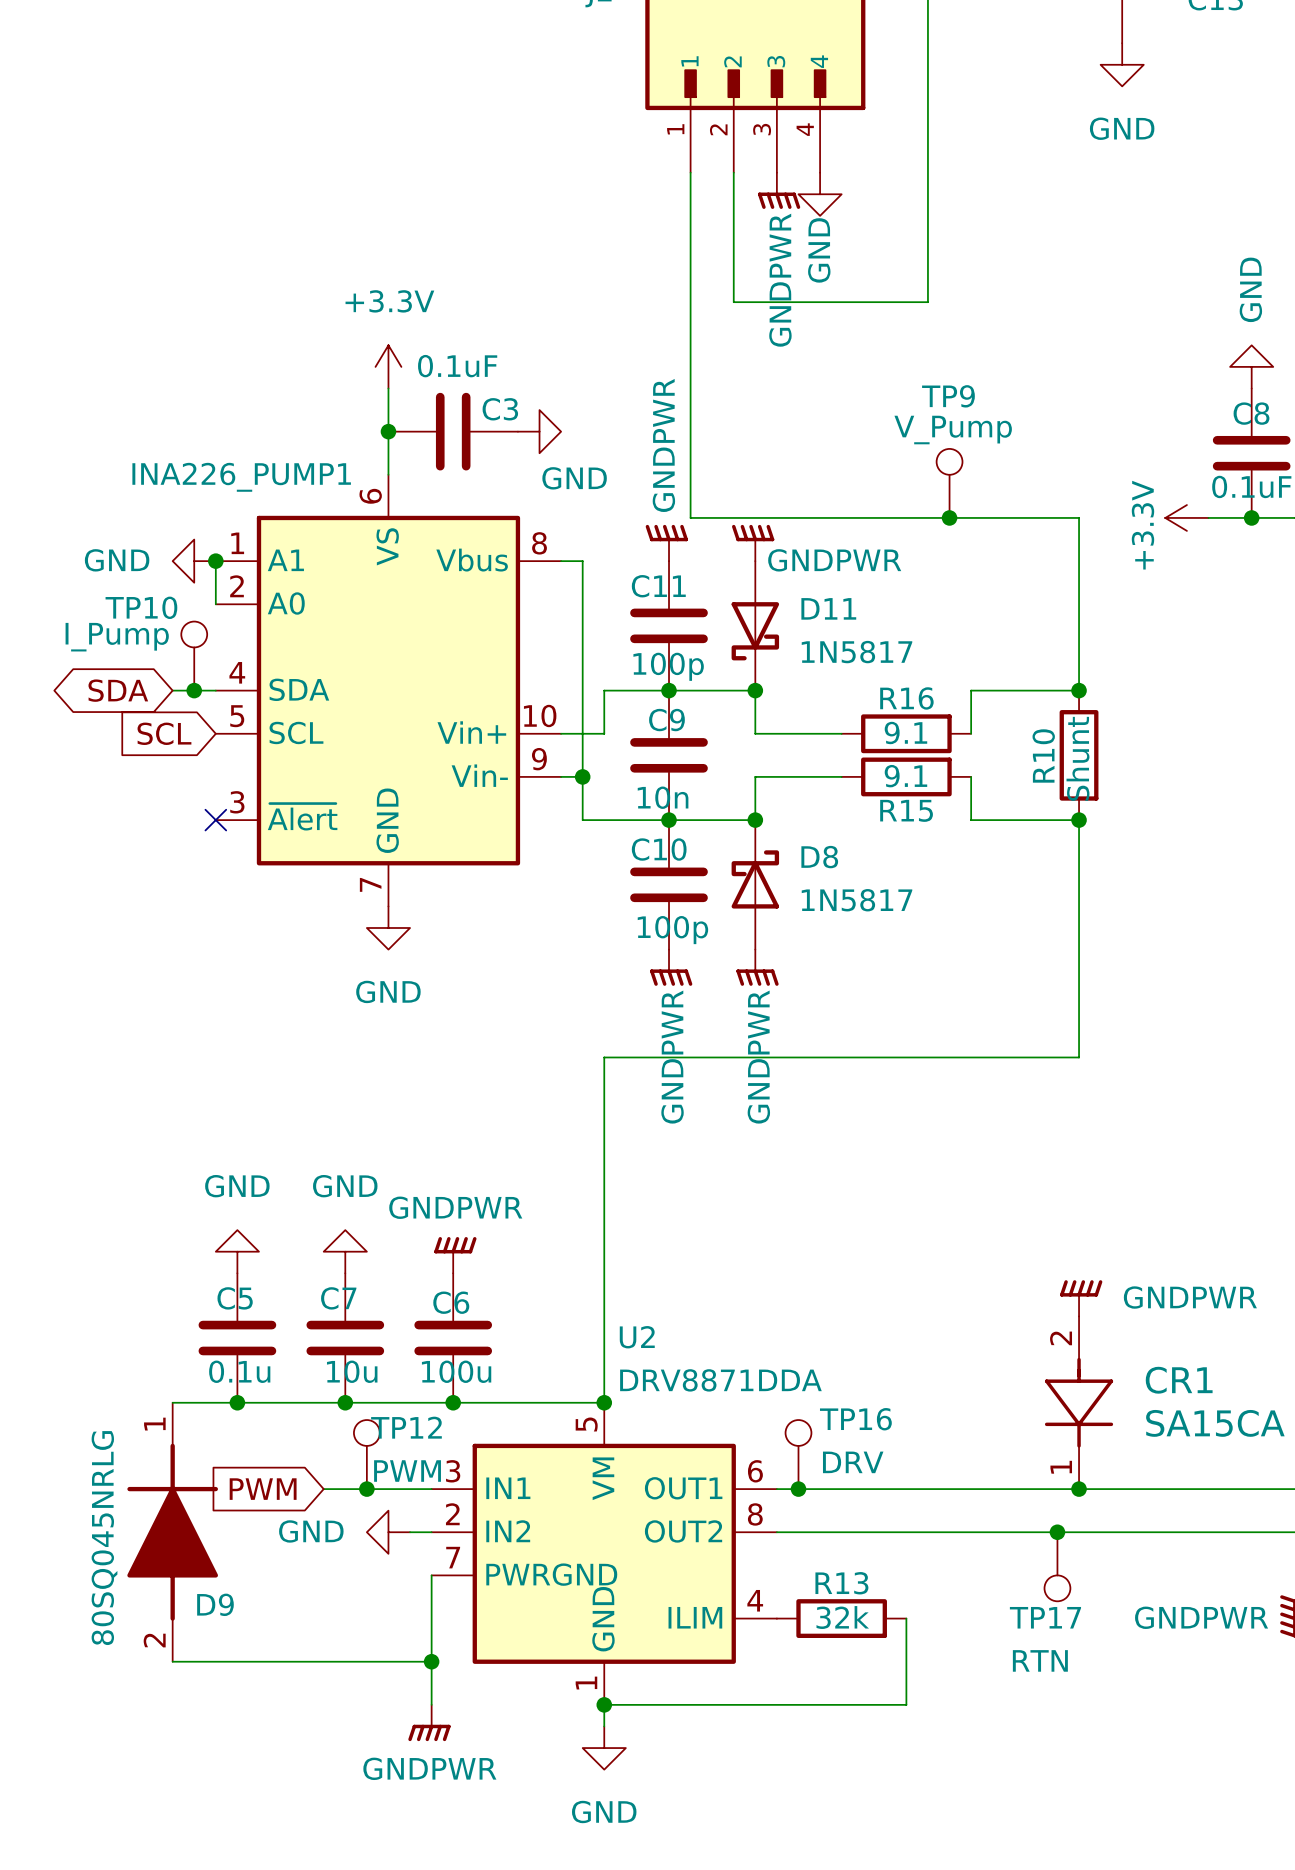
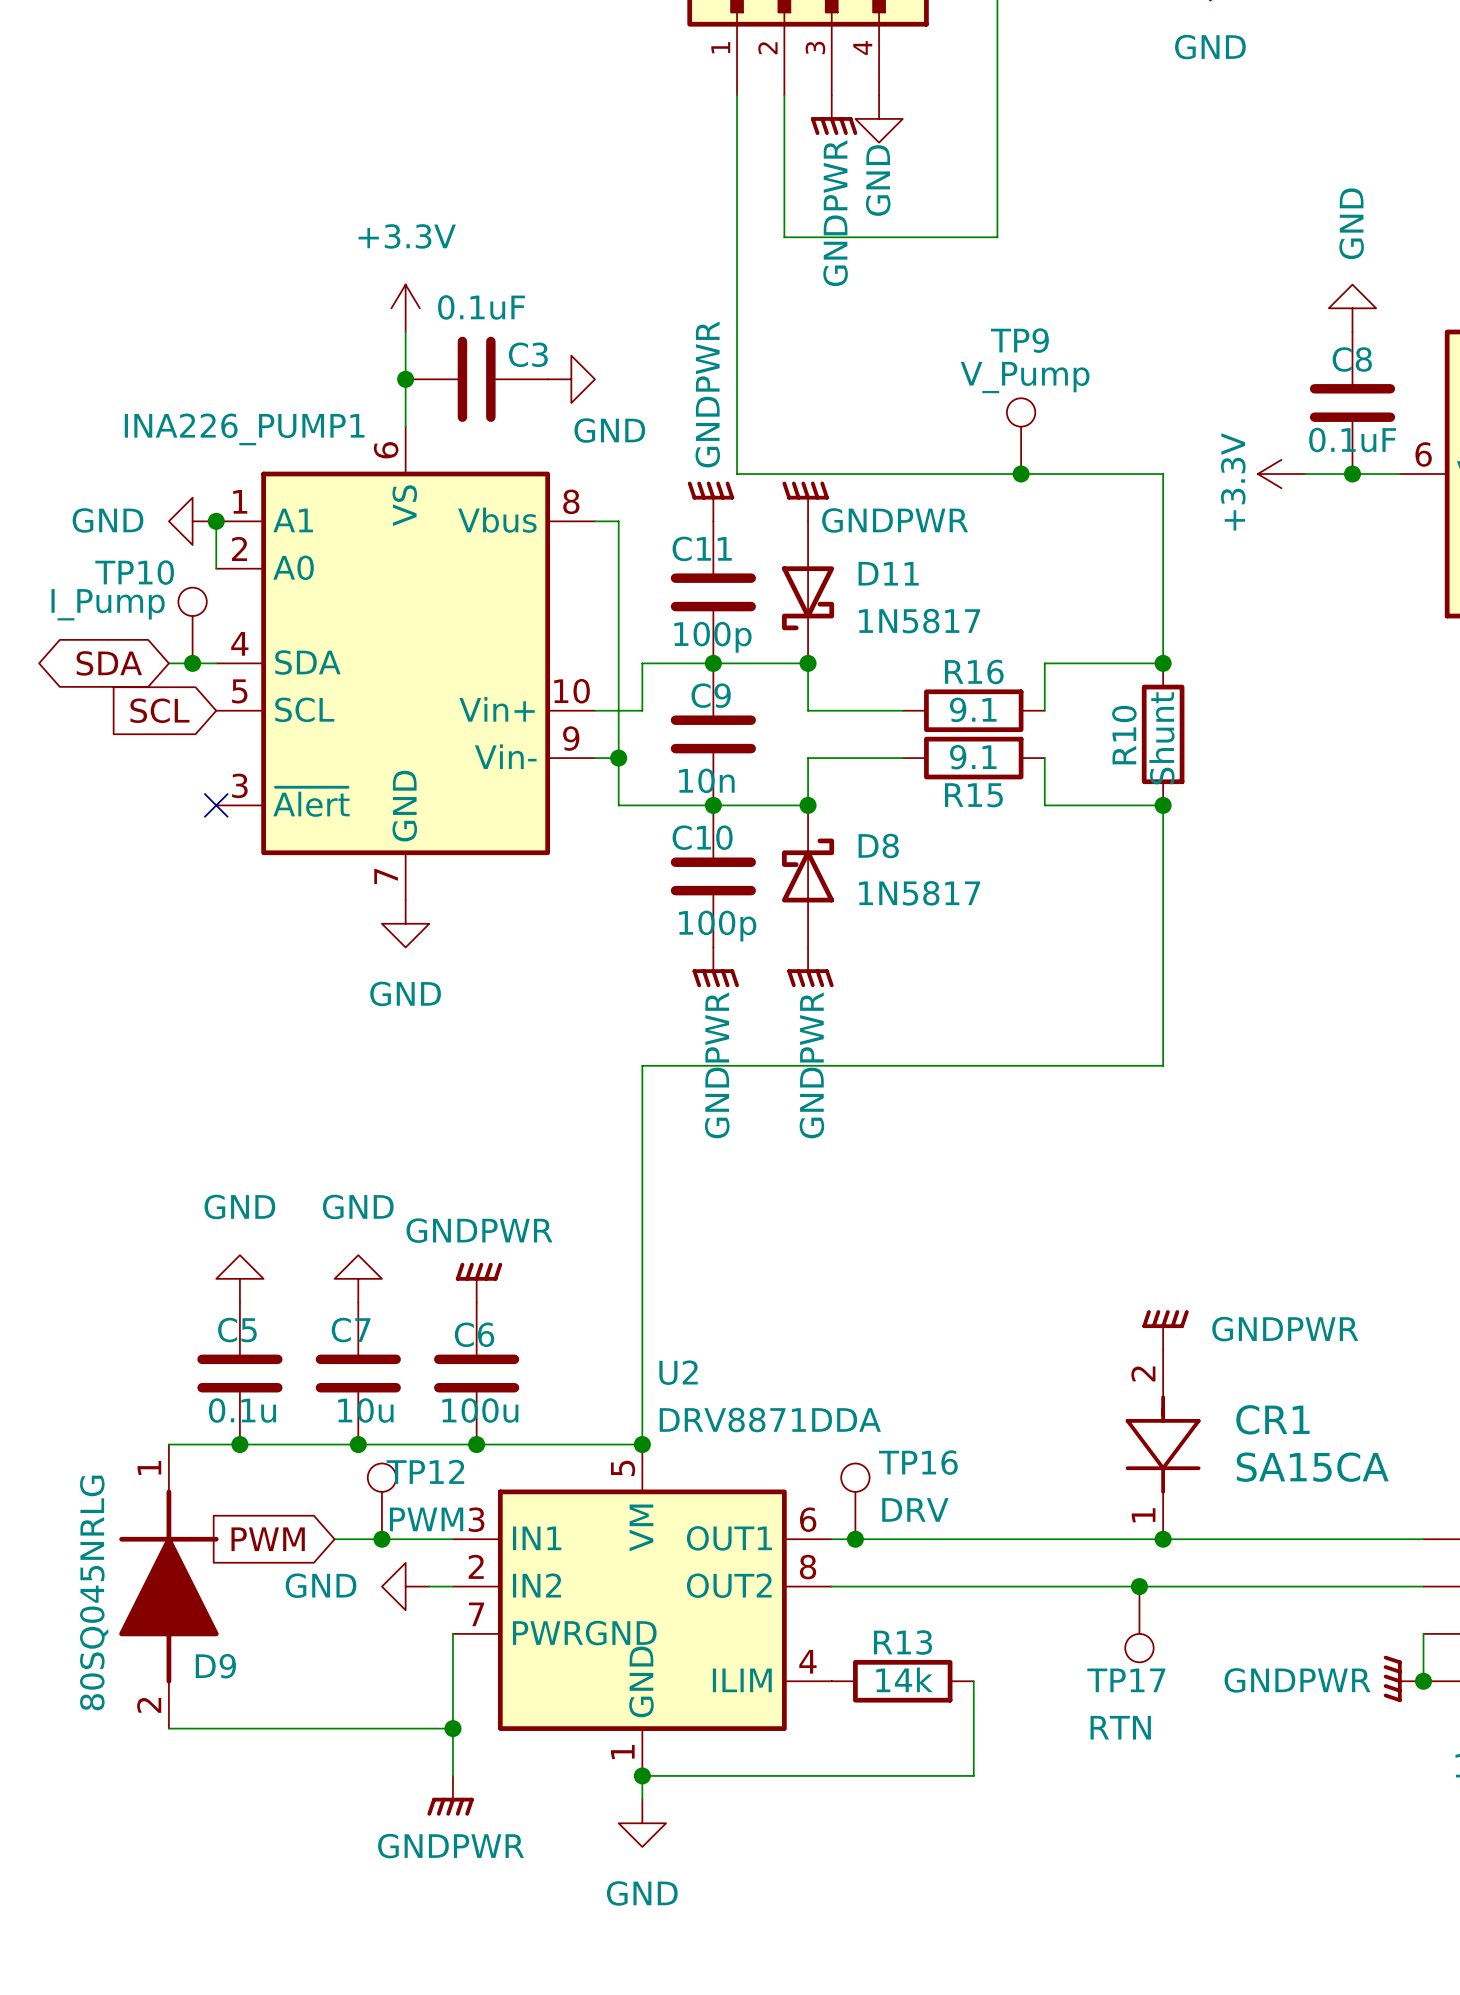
R13 value: 32k (842, 1617) -> 14k (904, 1679)

